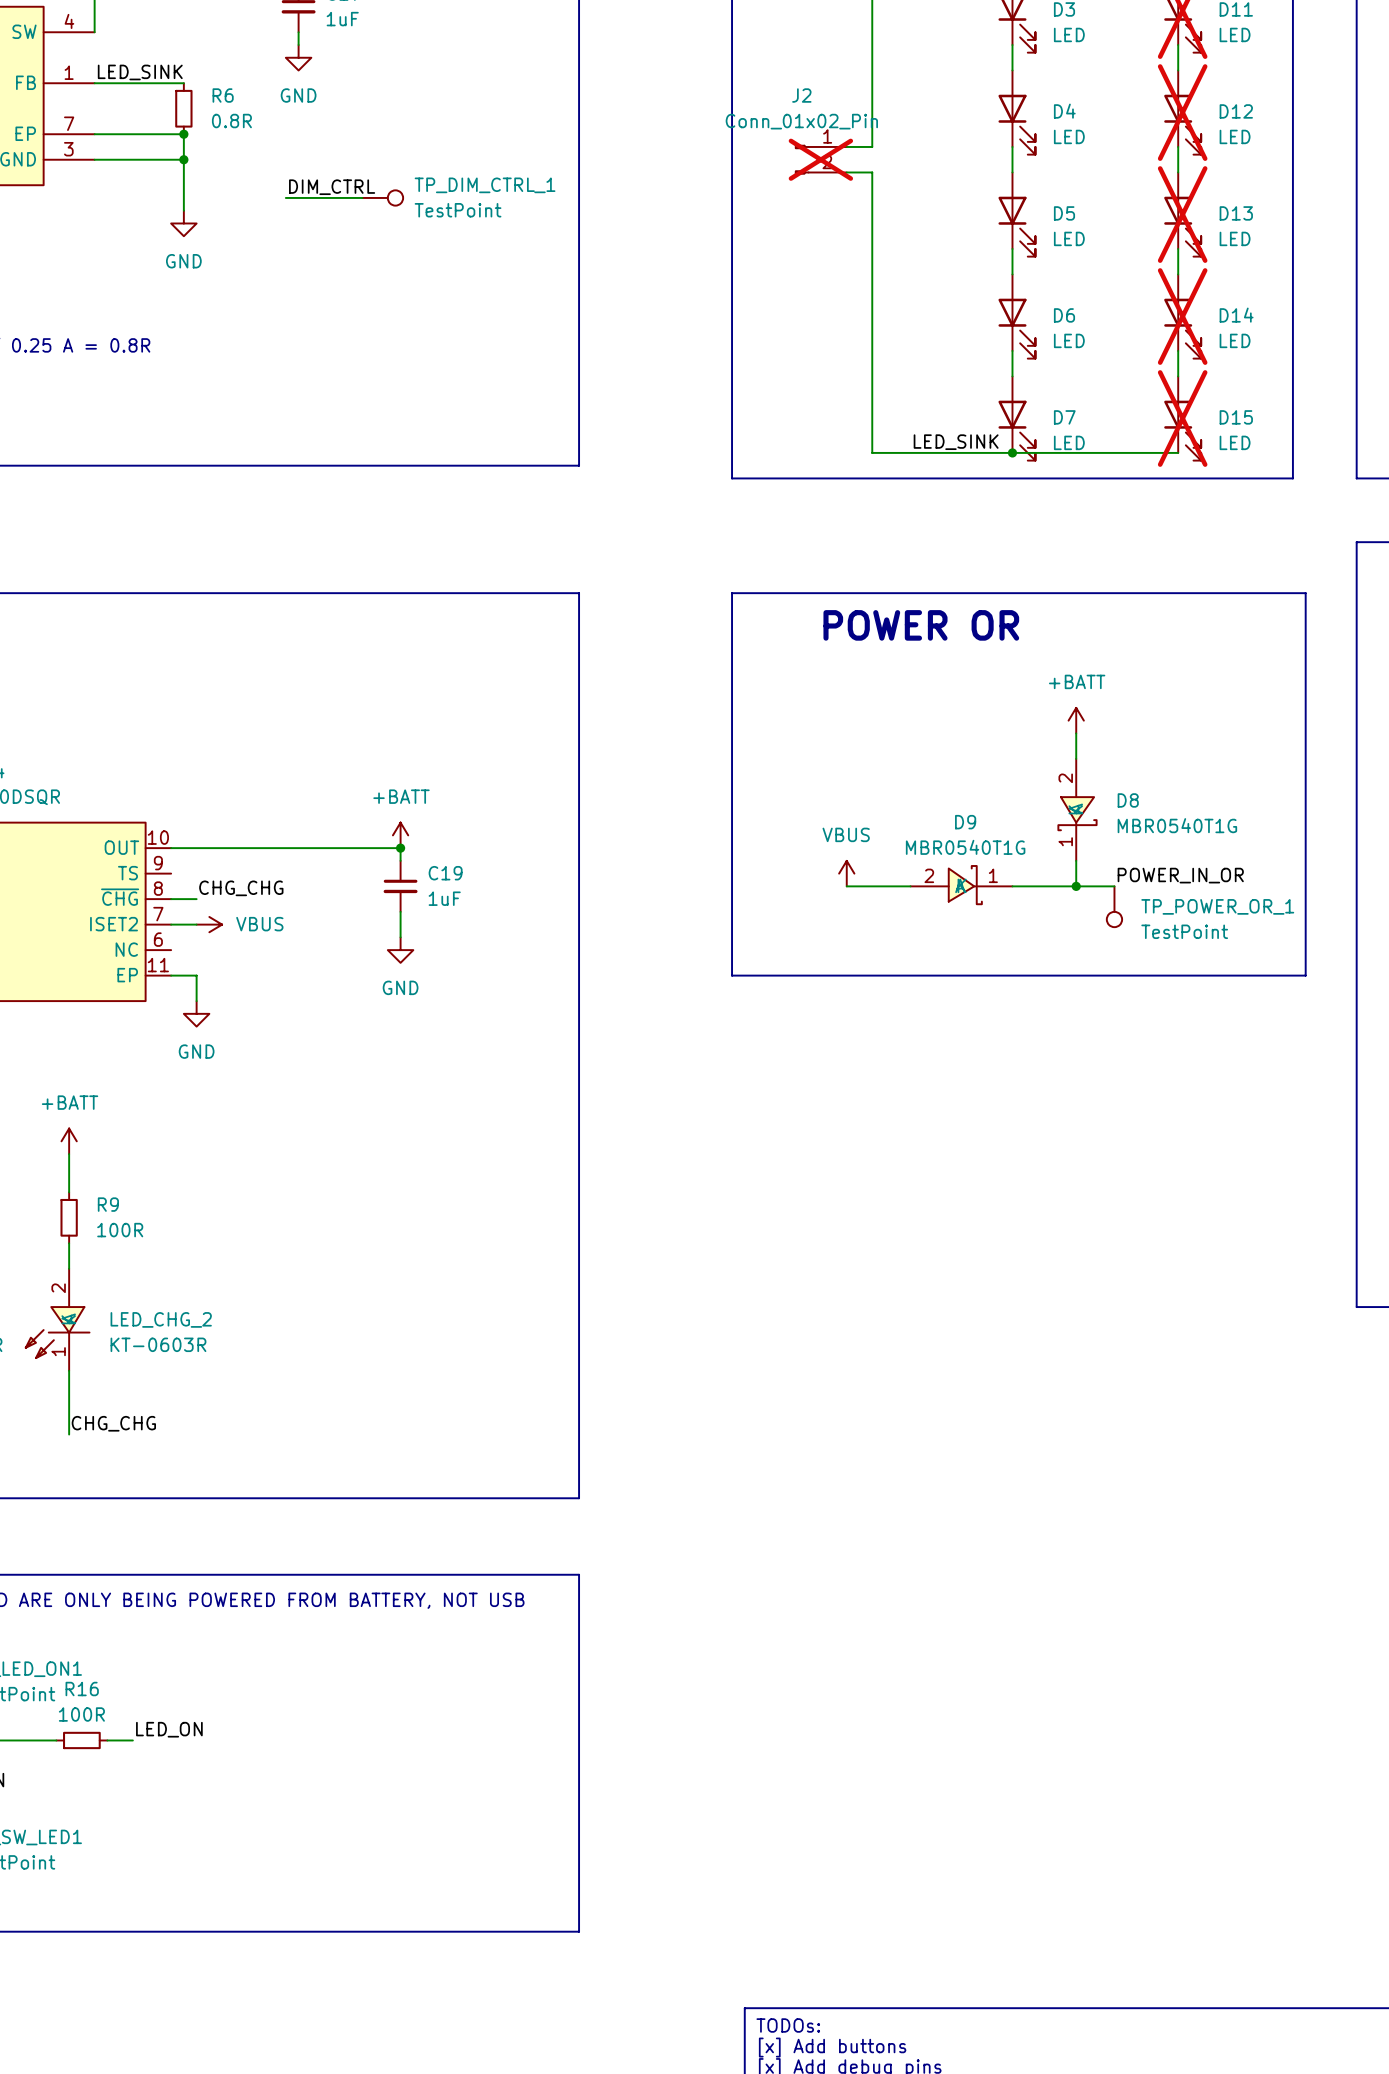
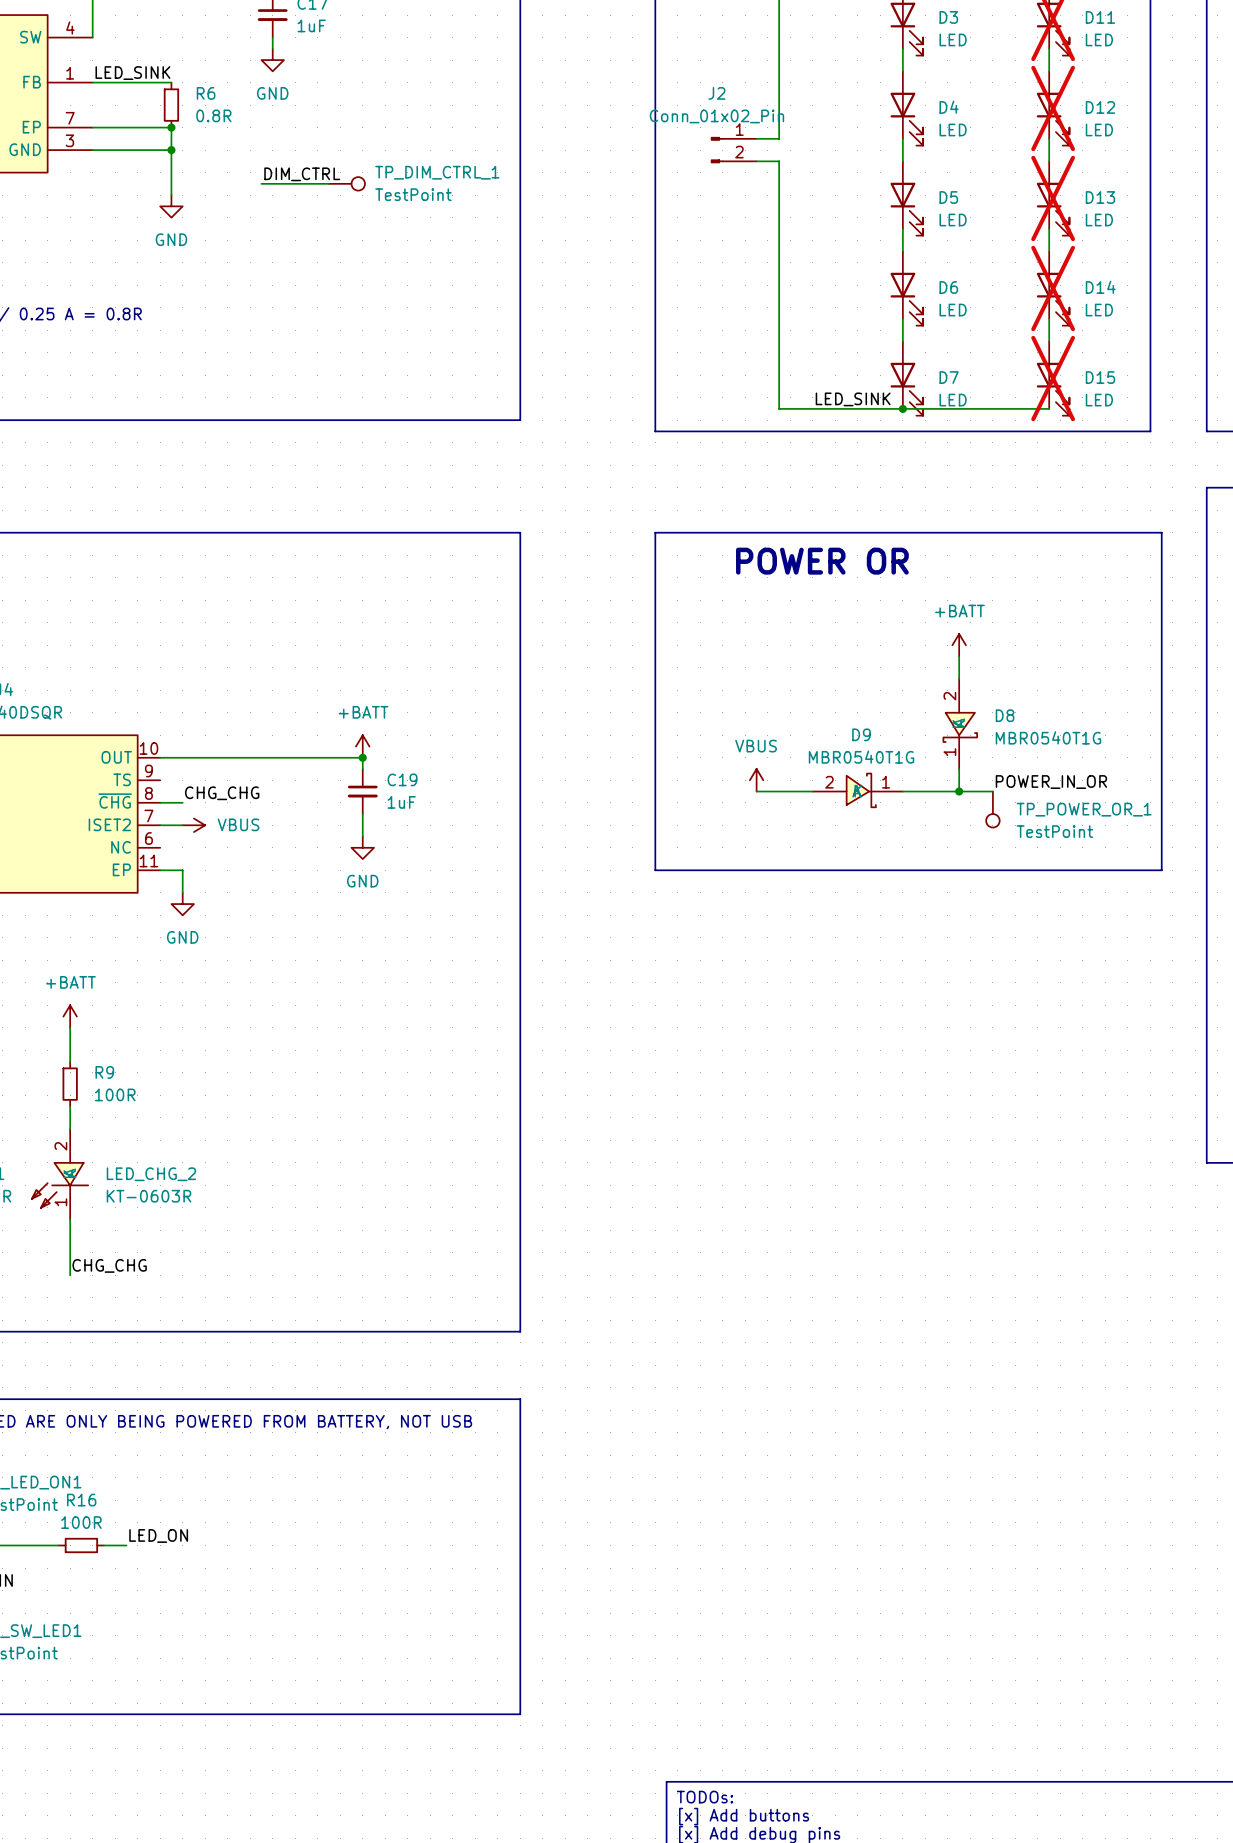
J2 do-not-place cross: (820, 159) -> none

